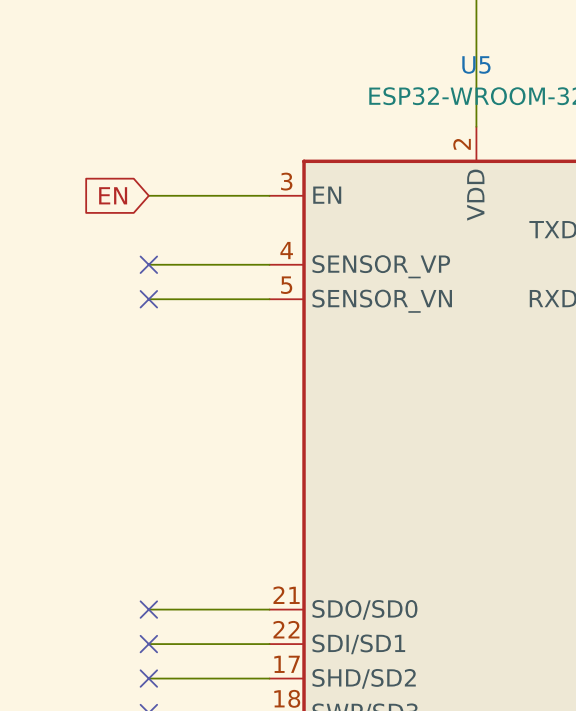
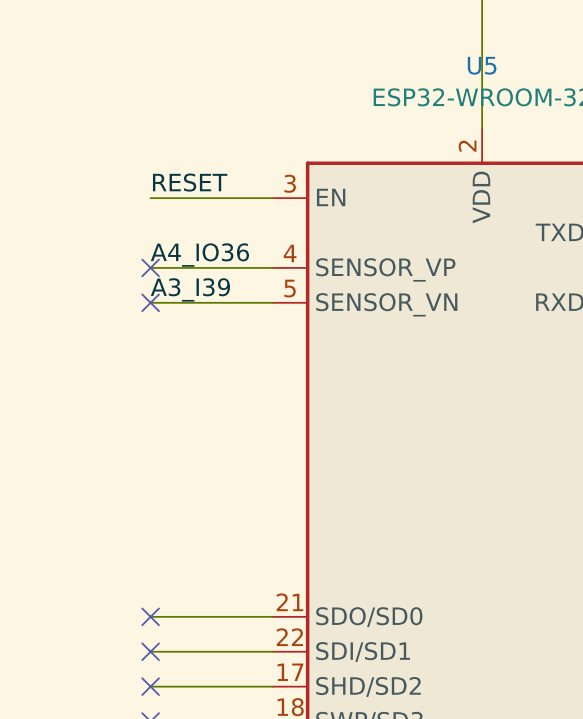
label: none -> RESET (190, 182)
global label: EN (113, 195) -> none
label: none -> A4_IO36 (199, 255)
label: none -> A3_I39 (190, 289)

